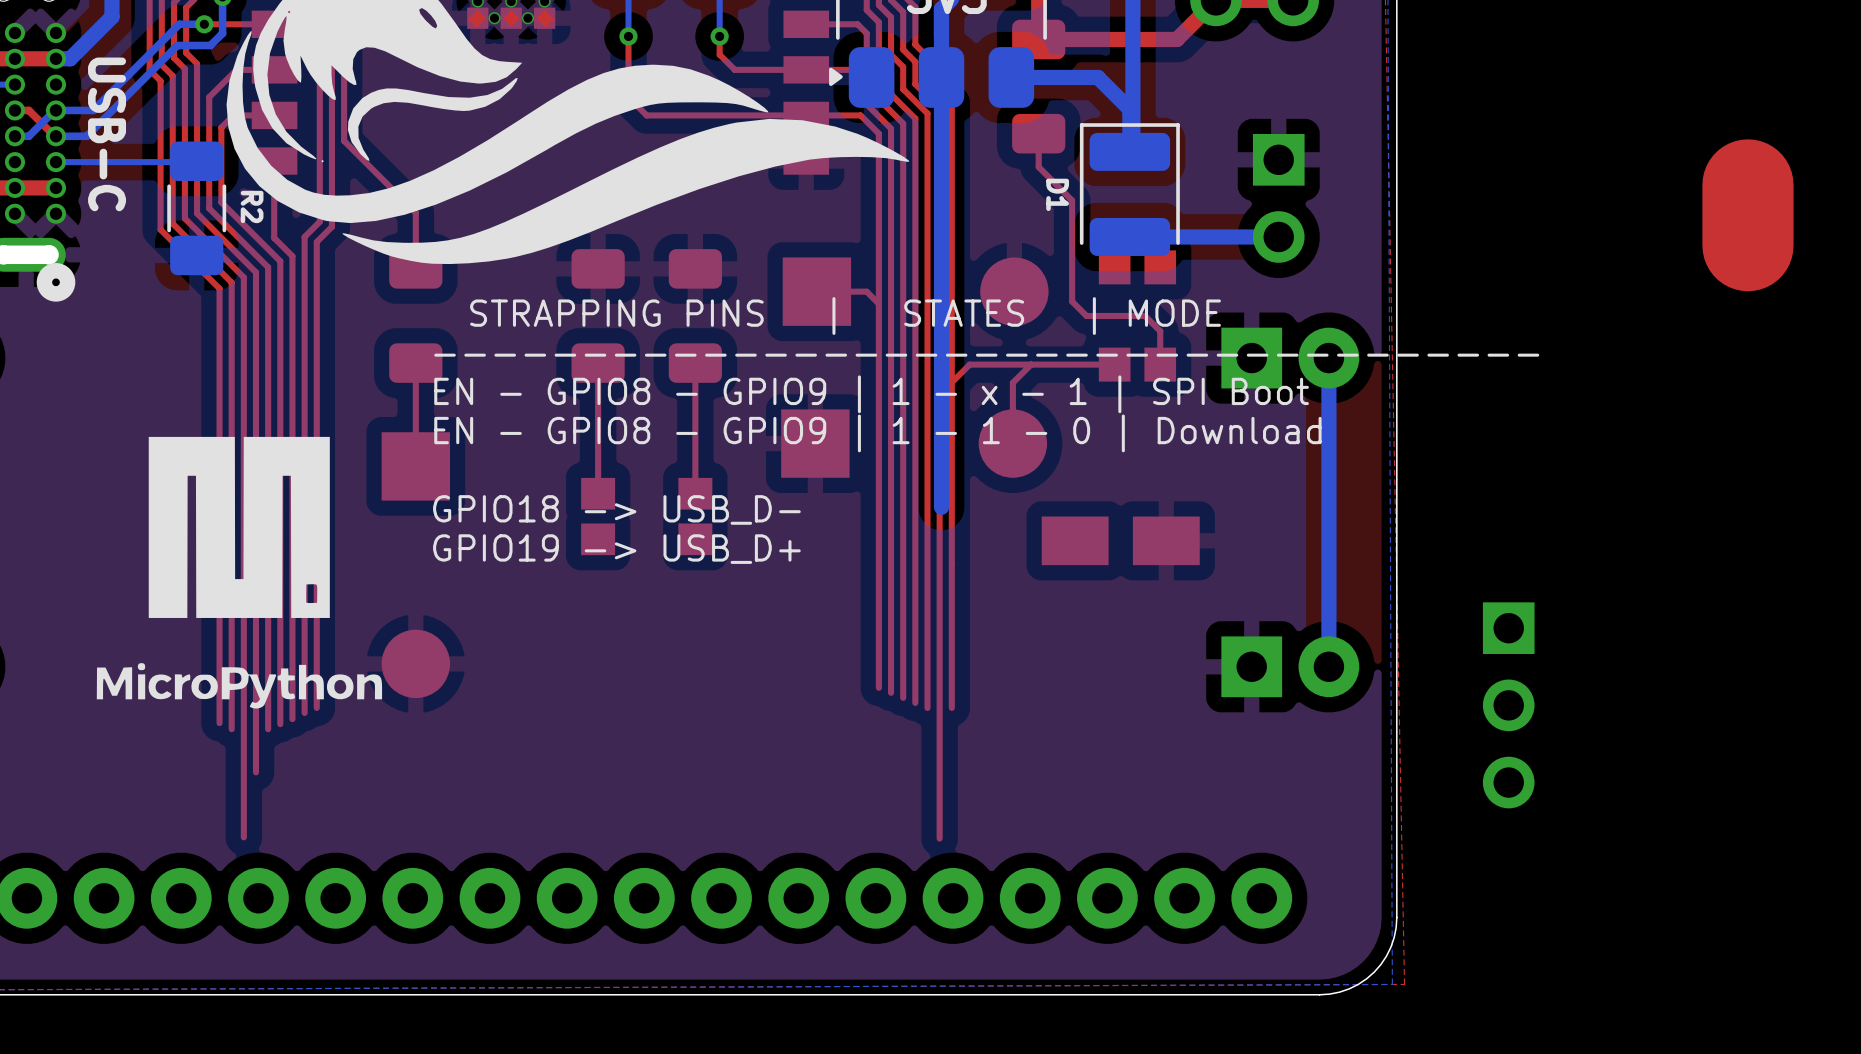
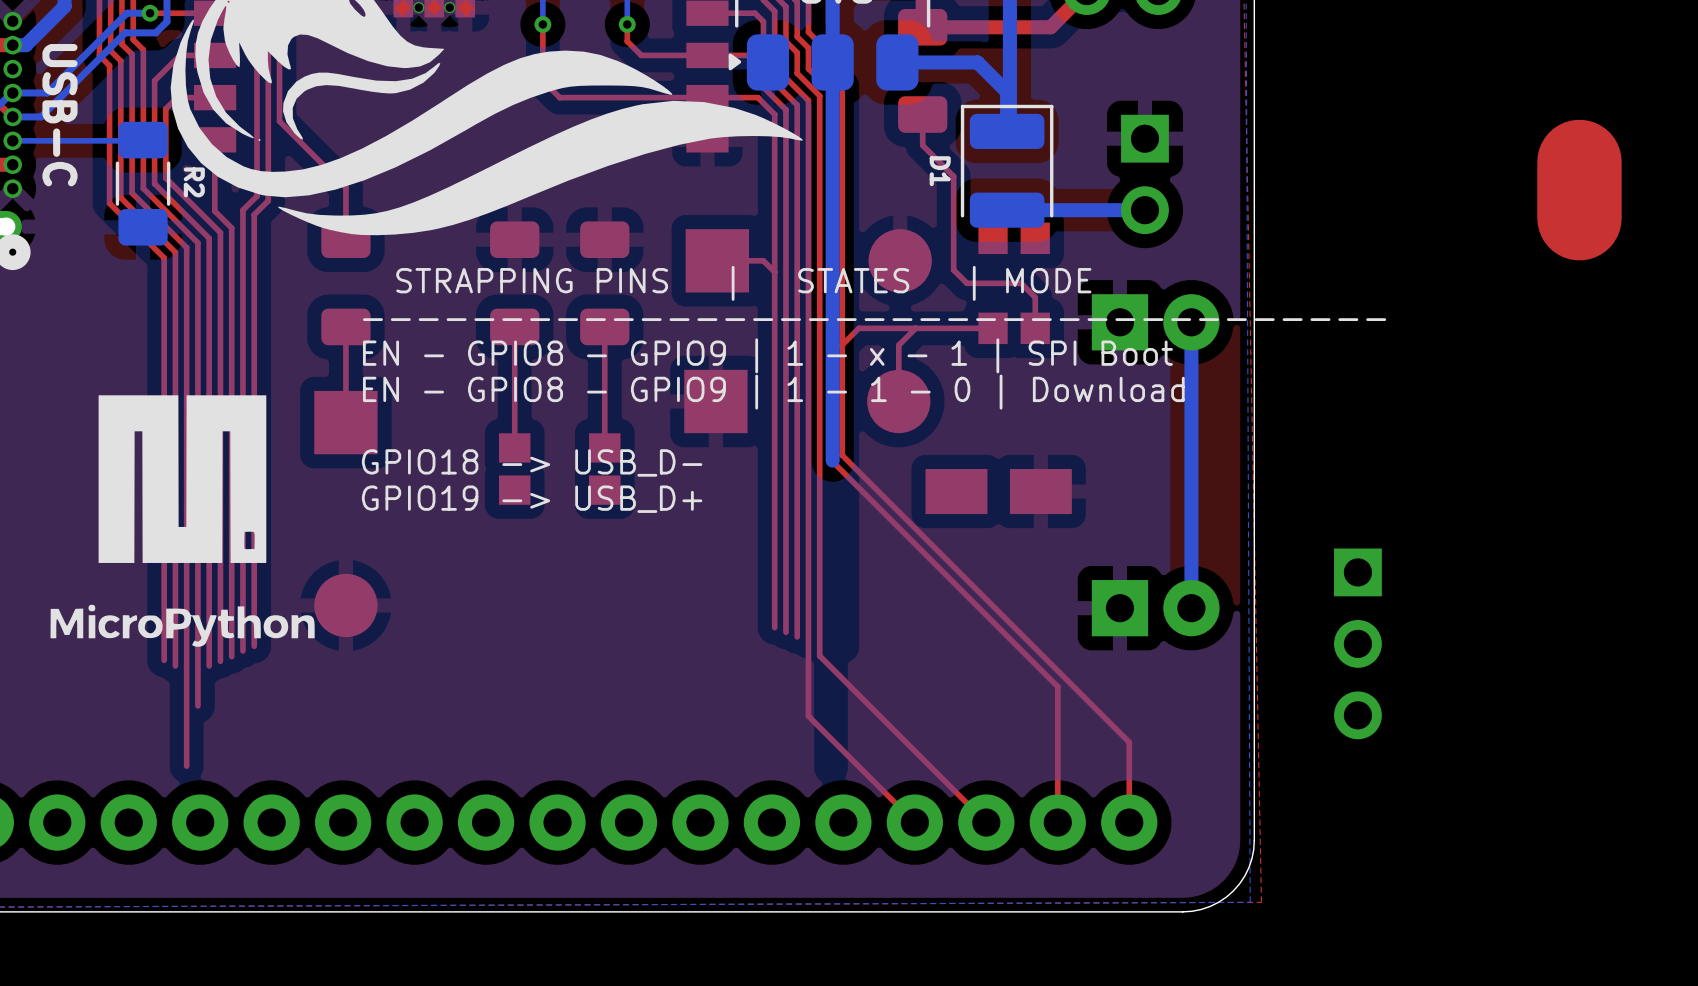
top track: (951, 501) (951, 707) -> (842, 455) (1129, 742) (1129, 822)
top track: (939, 506) (939, 838) -> (830, 459) (1057, 686) (1057, 822)
top track: none -> (808, 641) (808, 716) (914, 822)
top track: none -> (819, 646) (819, 655) (986, 822)

